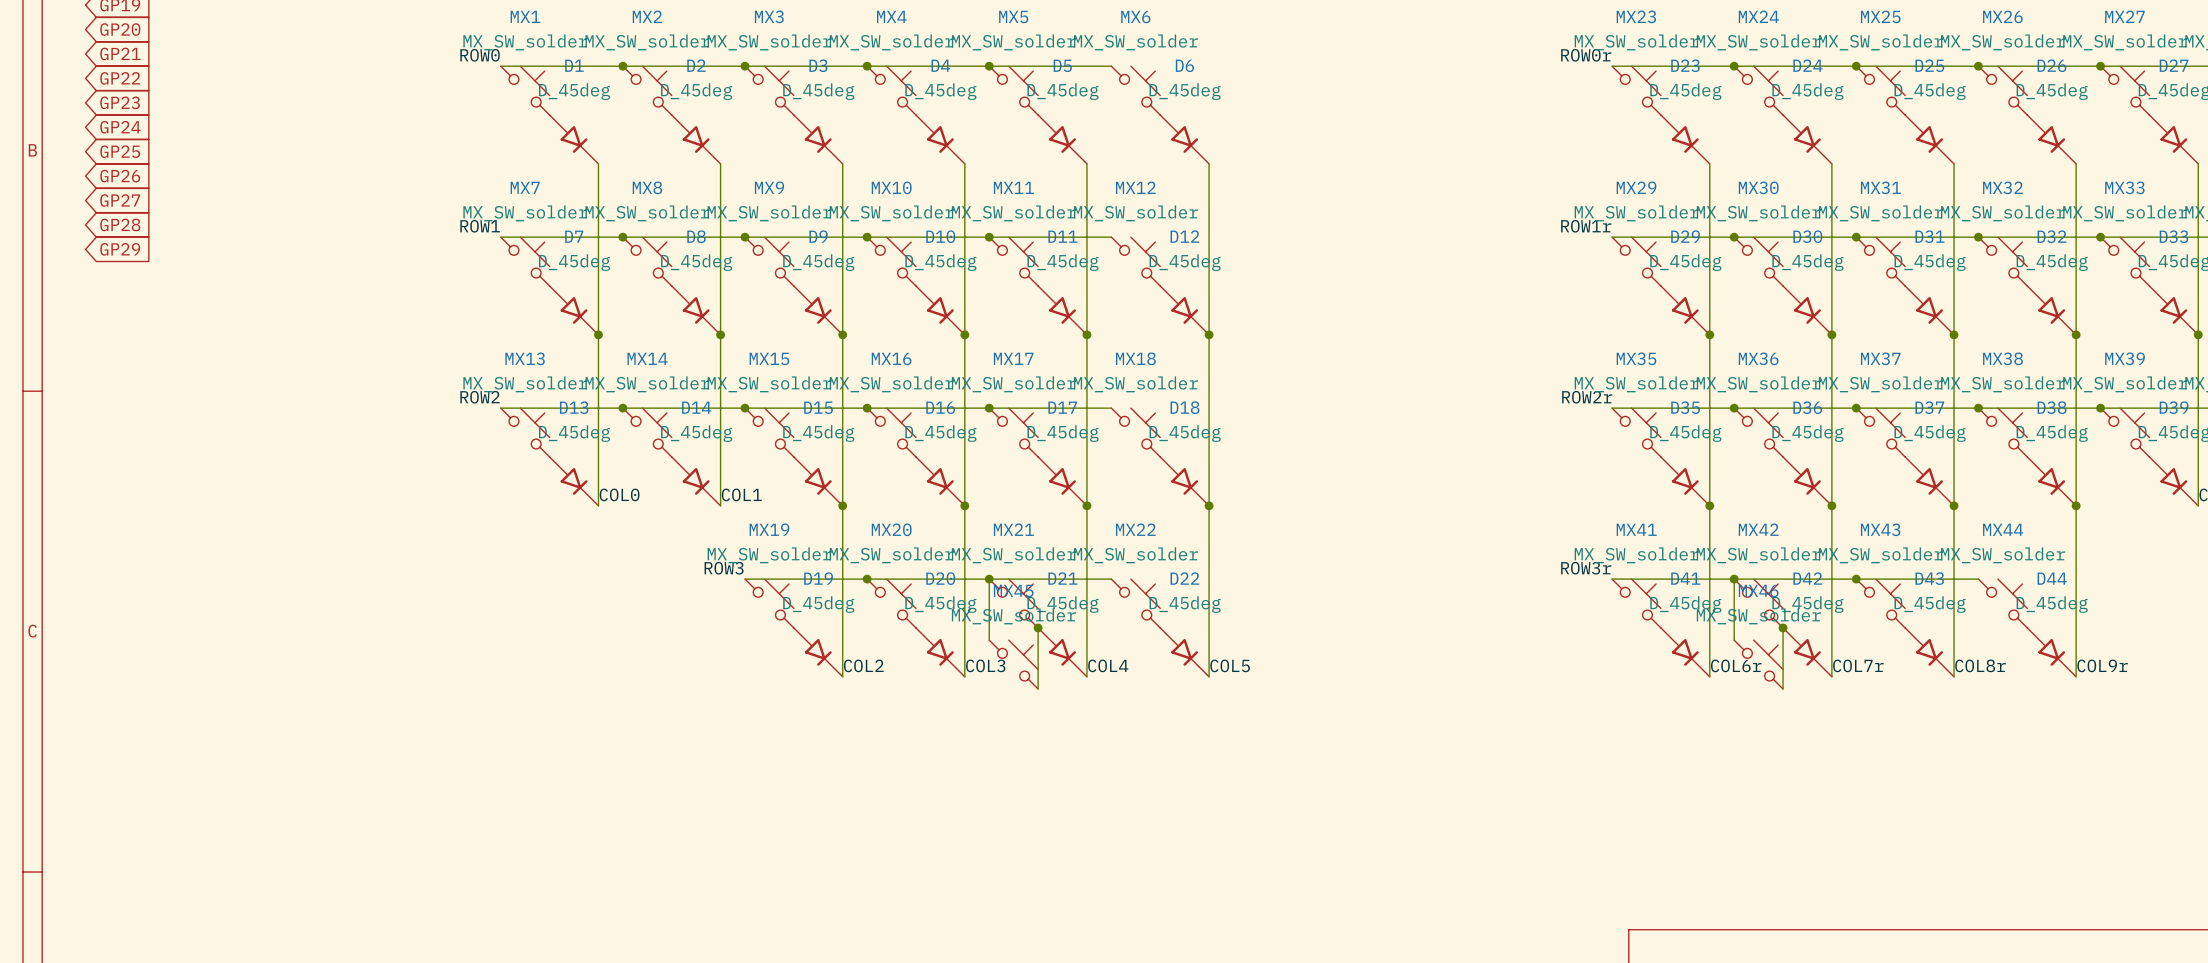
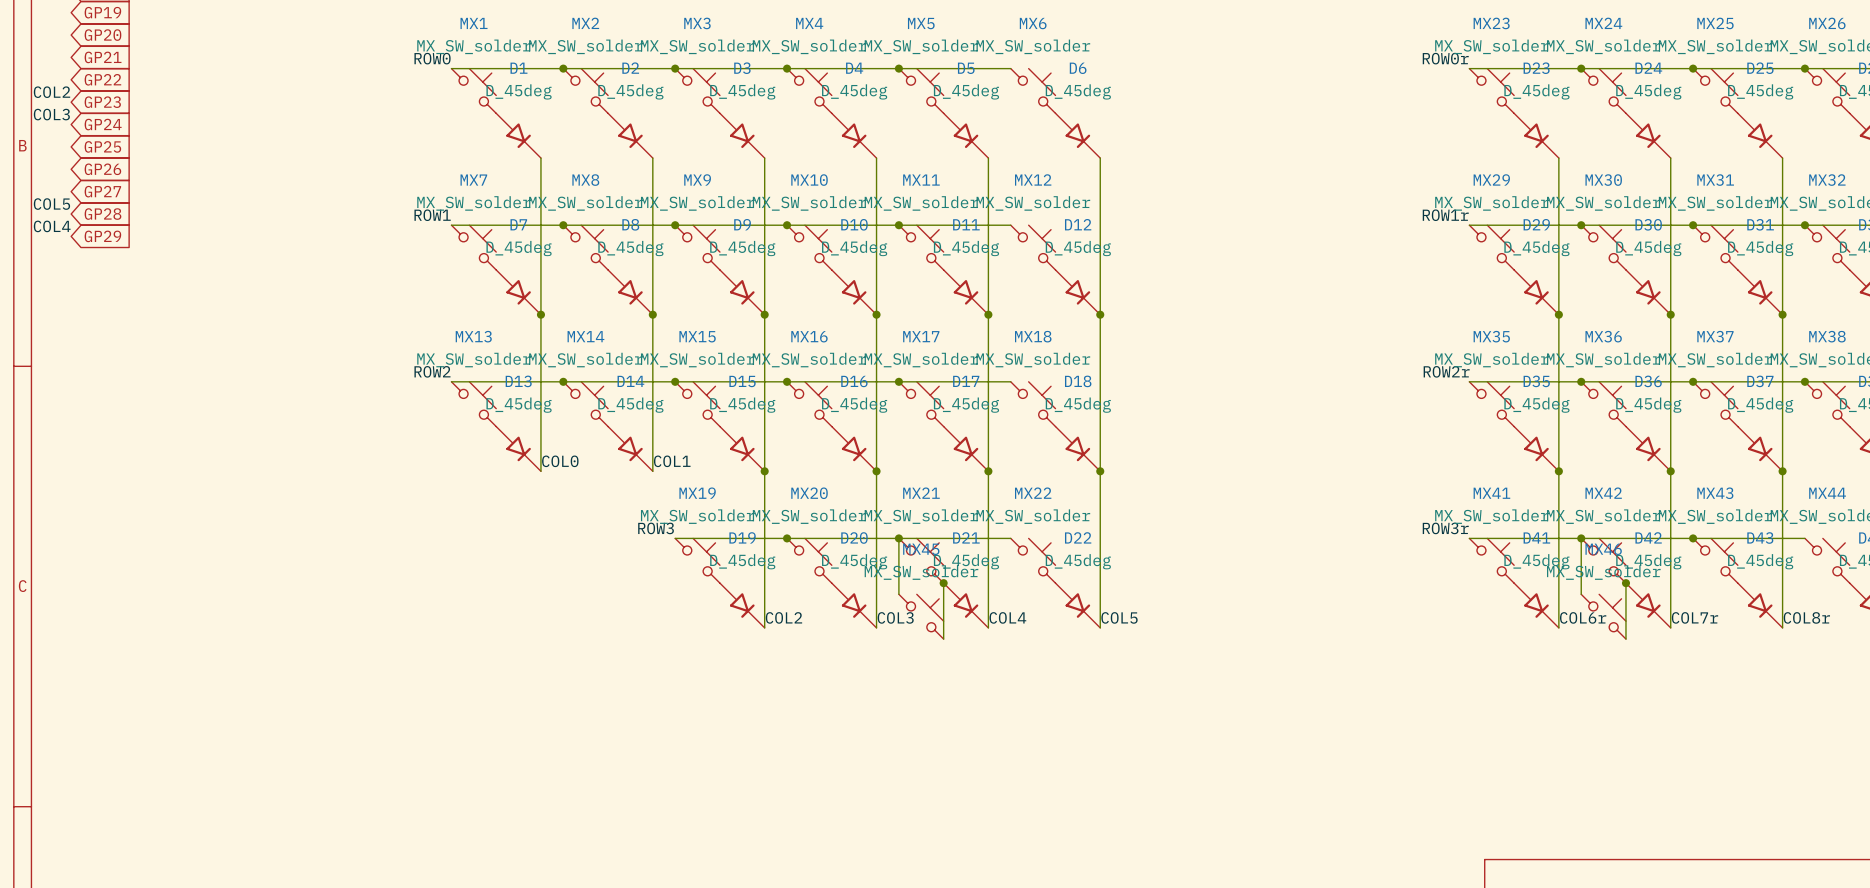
label: none -> COL2 (51, 92)
label: none -> COL3 (51, 114)
label: none -> COL5 (51, 204)
label: none -> COL4 (52, 226)

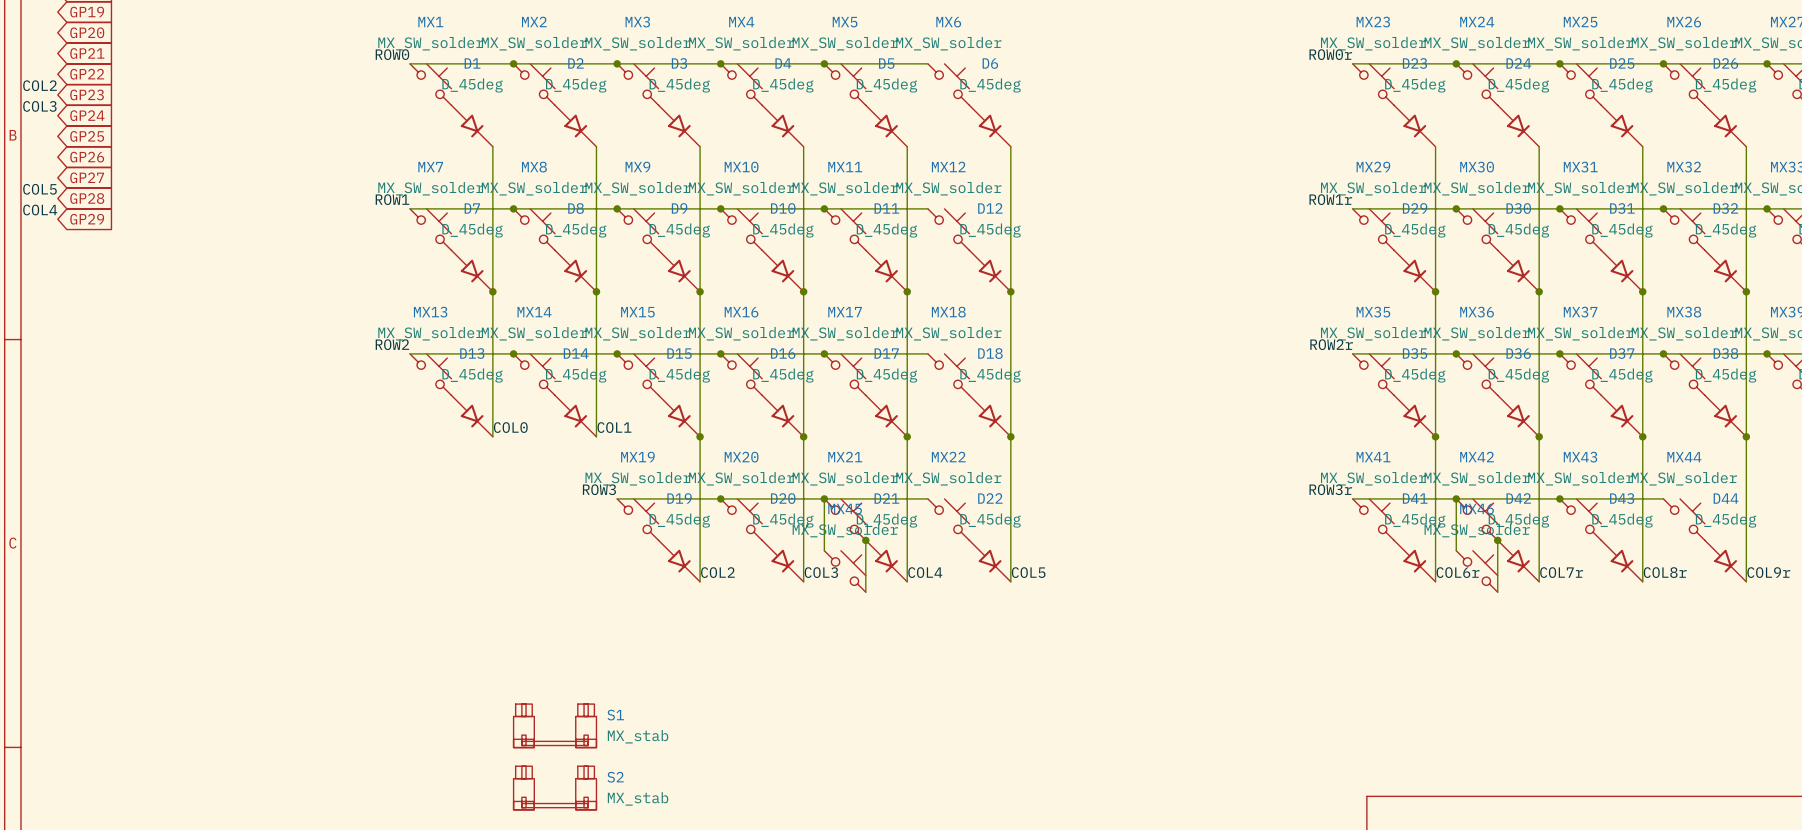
S1: none -> MX_stab (555, 725)
S2: none -> MX_stab (555, 787)

